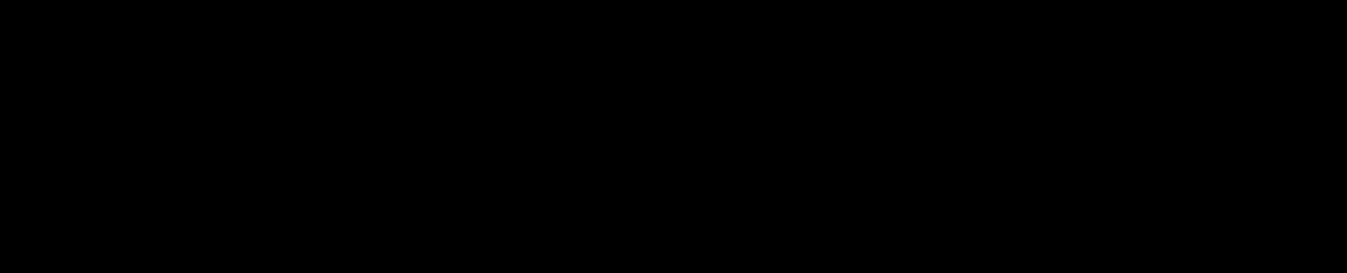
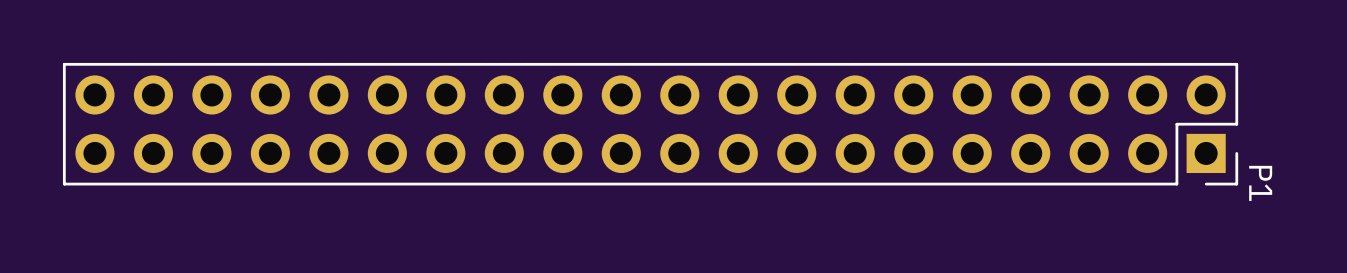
P1: none -> (650, 124)

